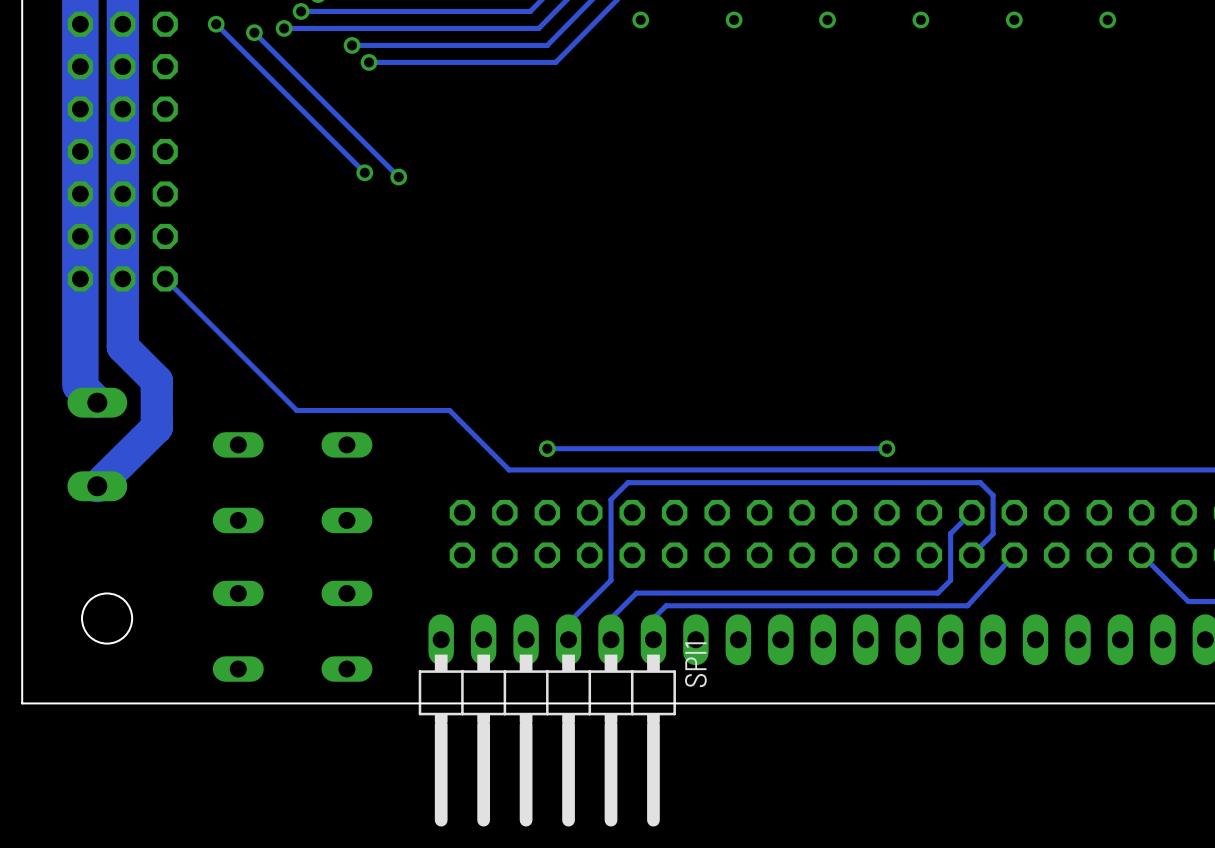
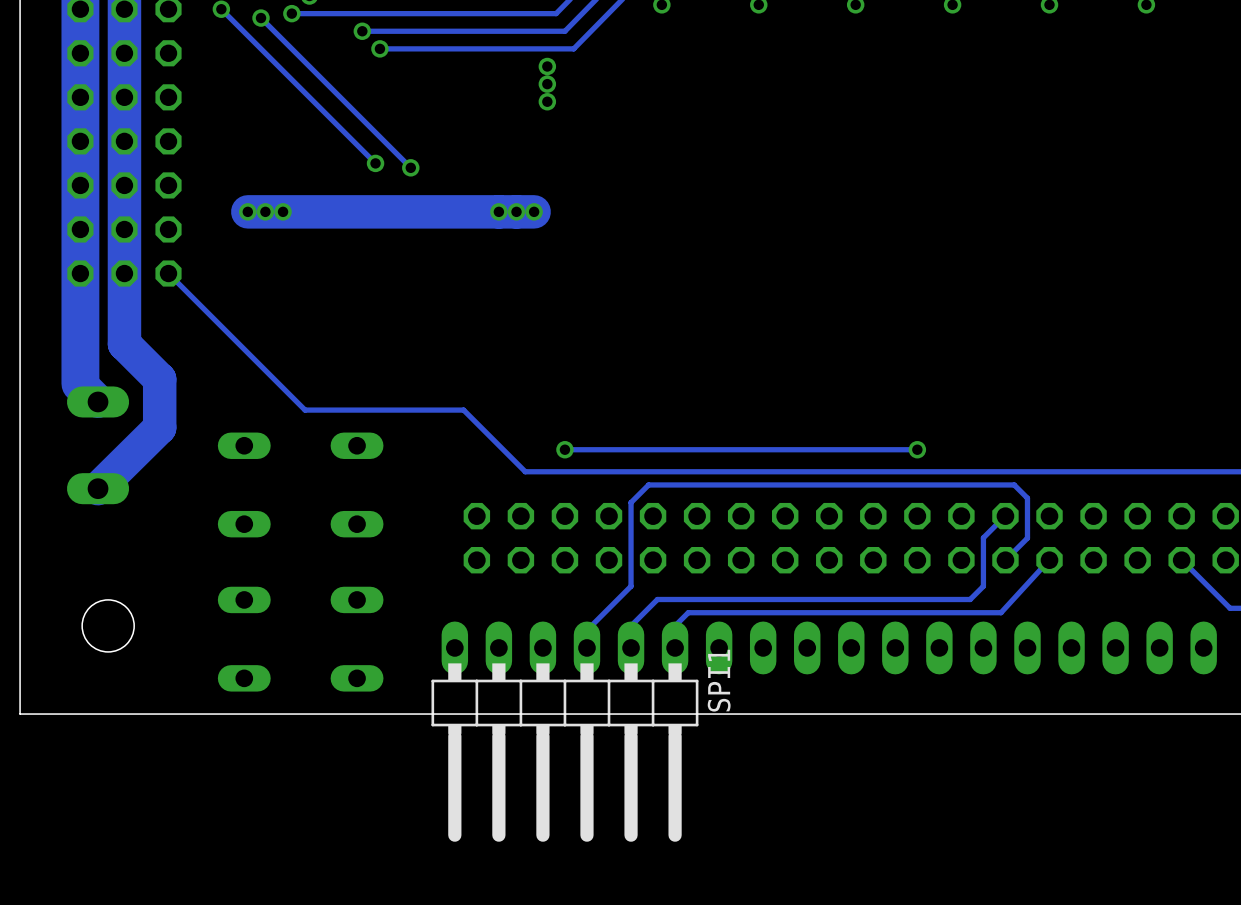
via: none -> (547, 66)
via: none -> (547, 84)
via: none -> (547, 101)
via: none -> (247, 211)
via: none -> (265, 211)
via: none -> (283, 211)
via: none -> (498, 211)
via: none -> (516, 211)
track: none -> (534, 211) (247, 211)
via: none -> (534, 211)

